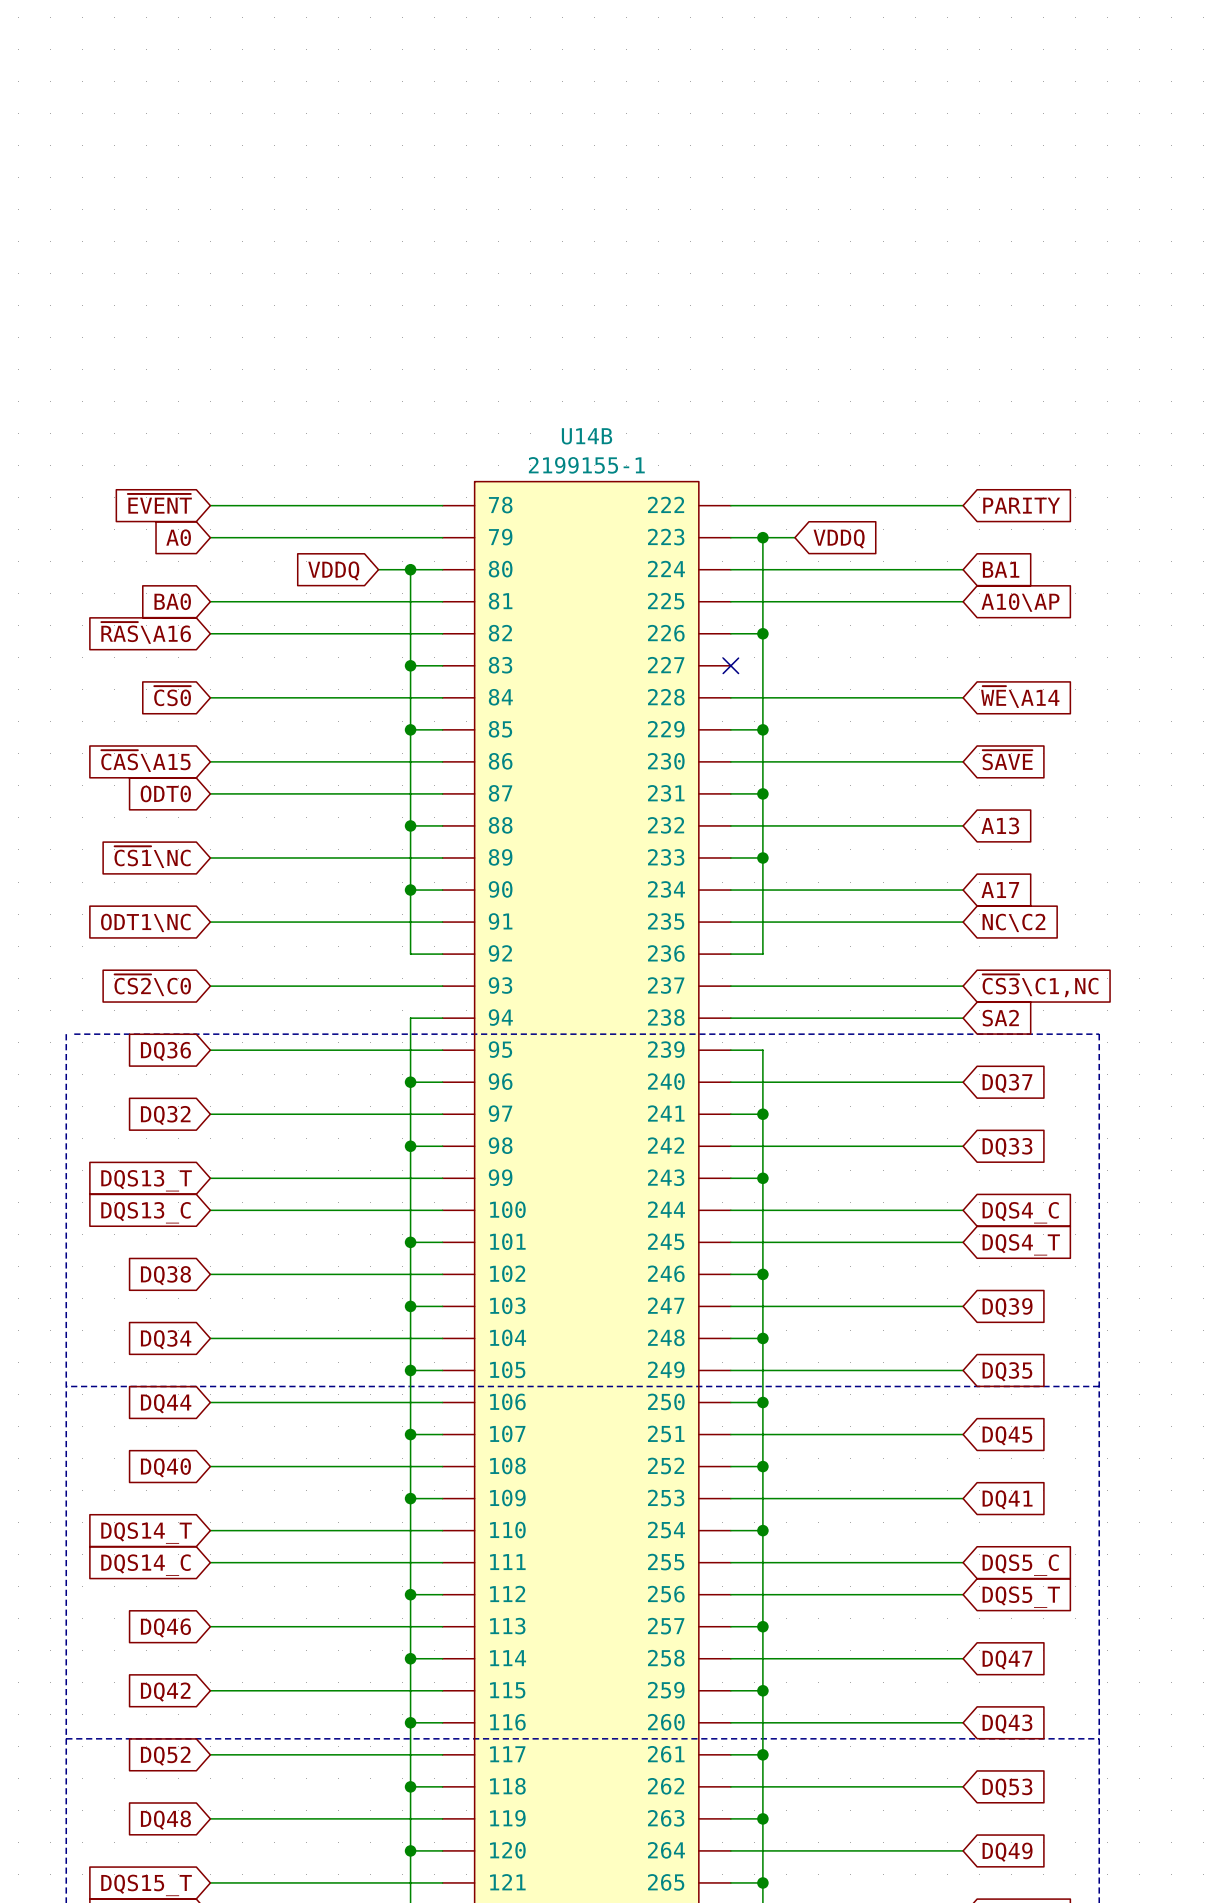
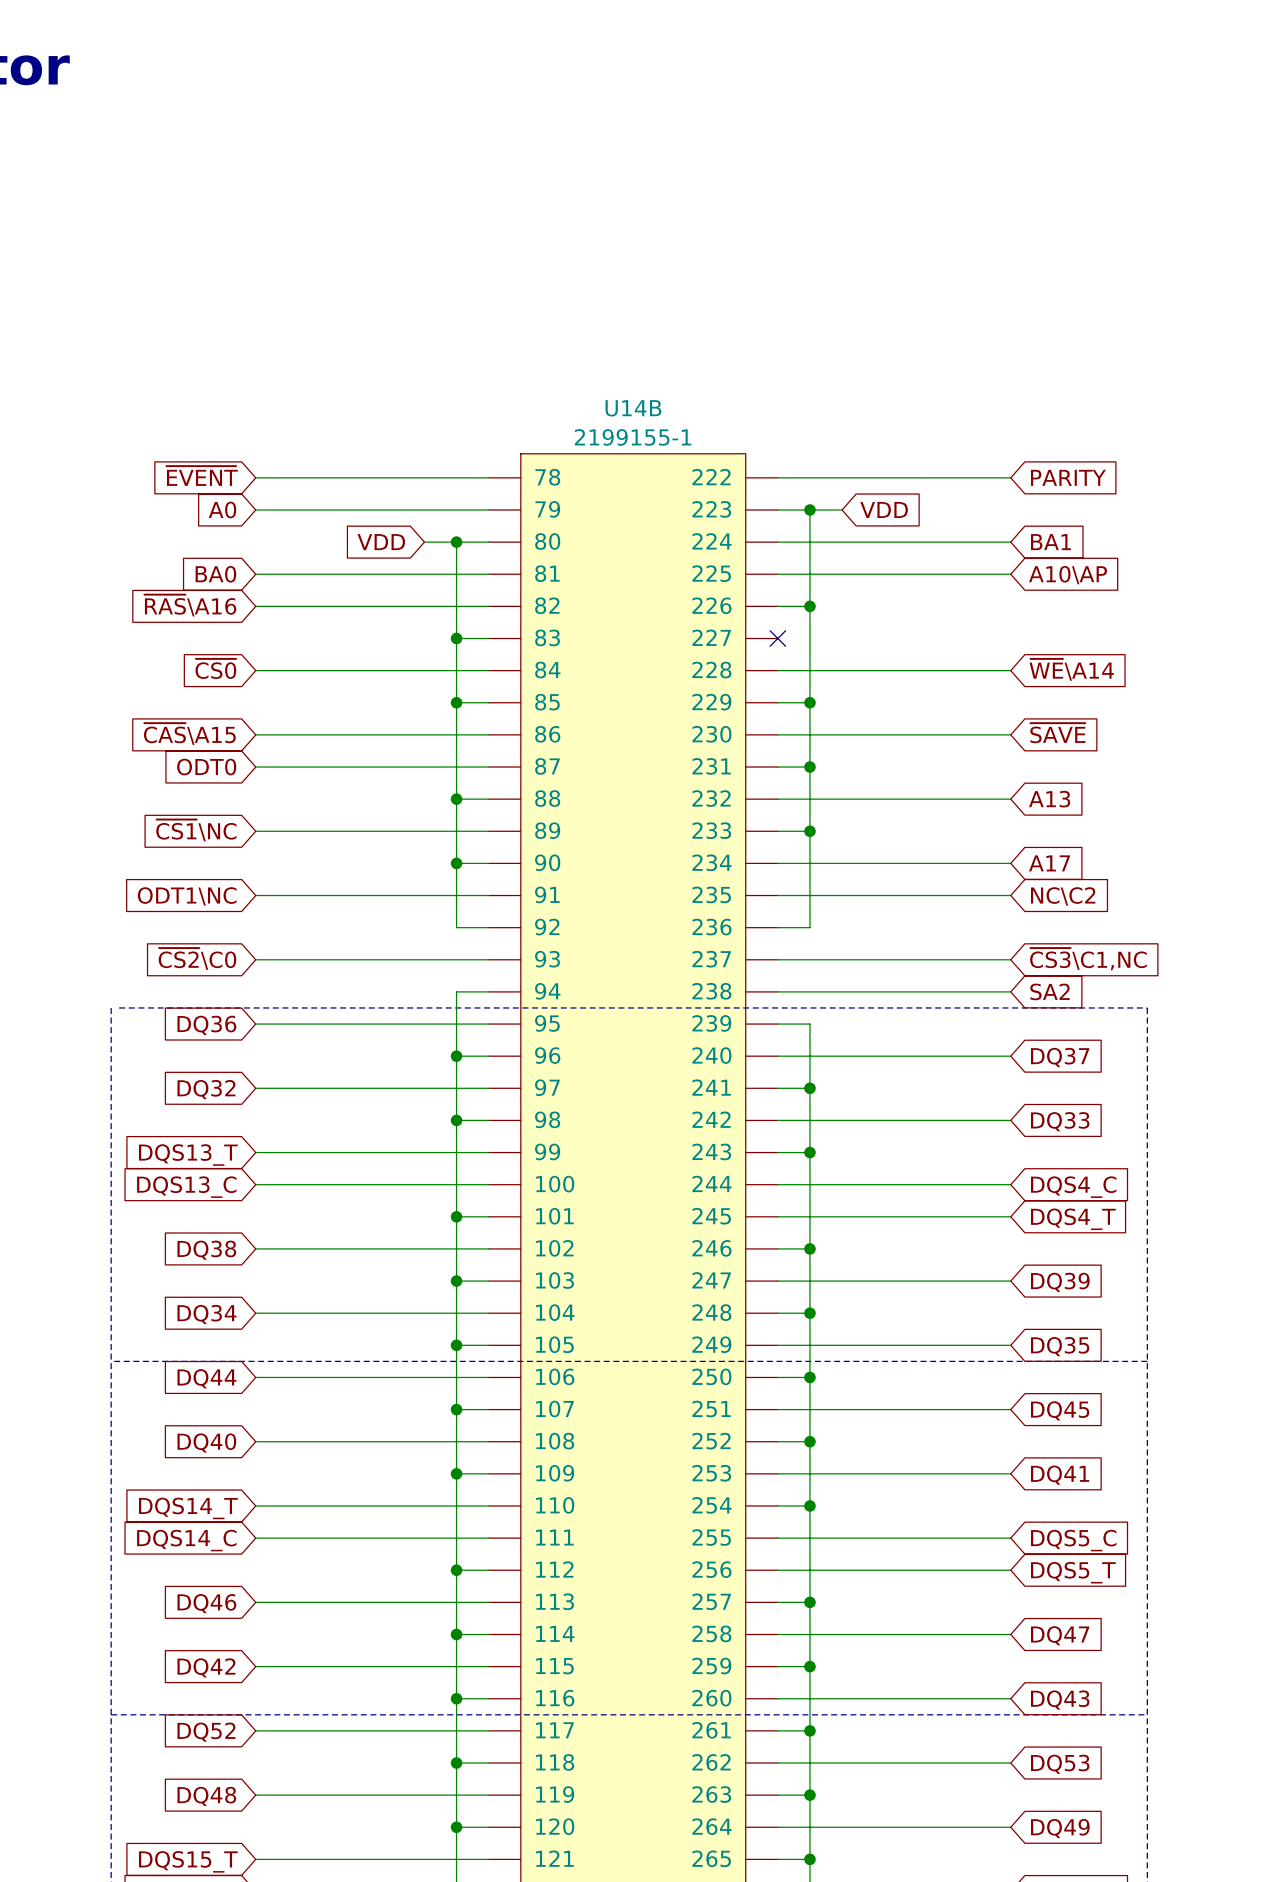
global label: VDDQ (839, 538) -> VDD (884, 509)
global label: VDDQ (333, 571) -> VDD (381, 542)

